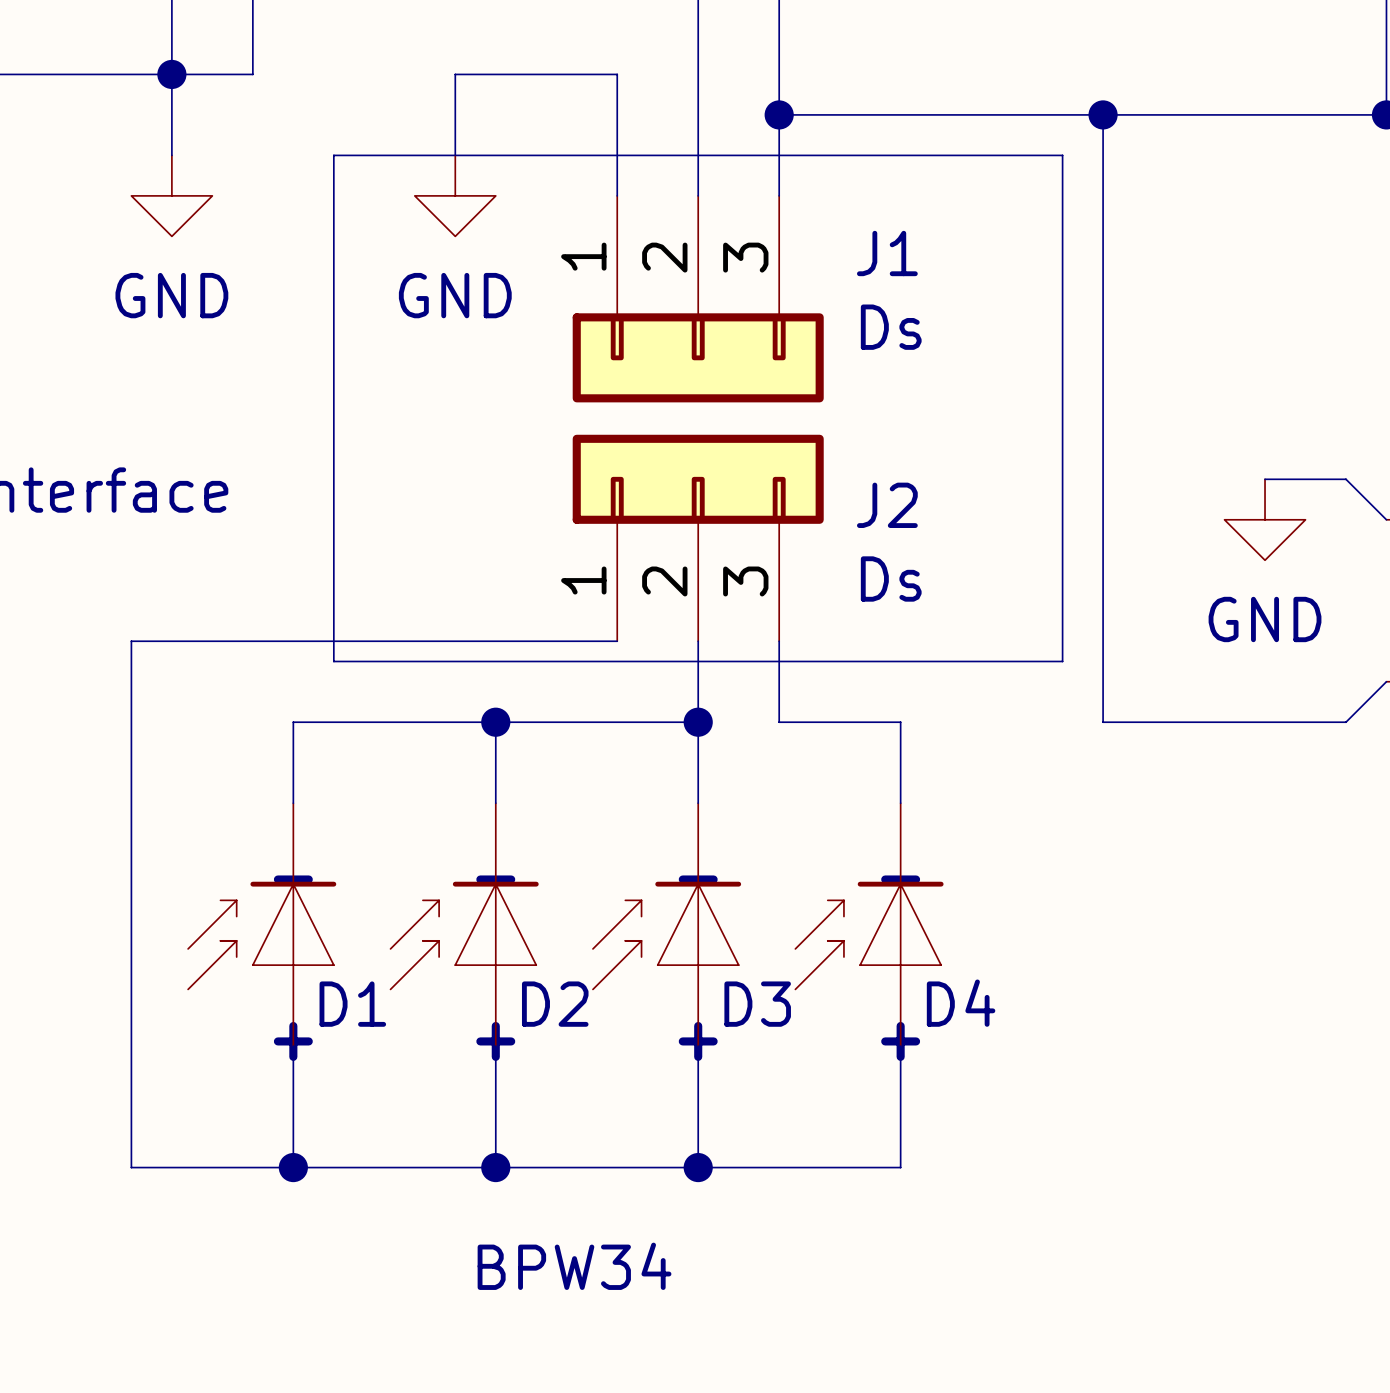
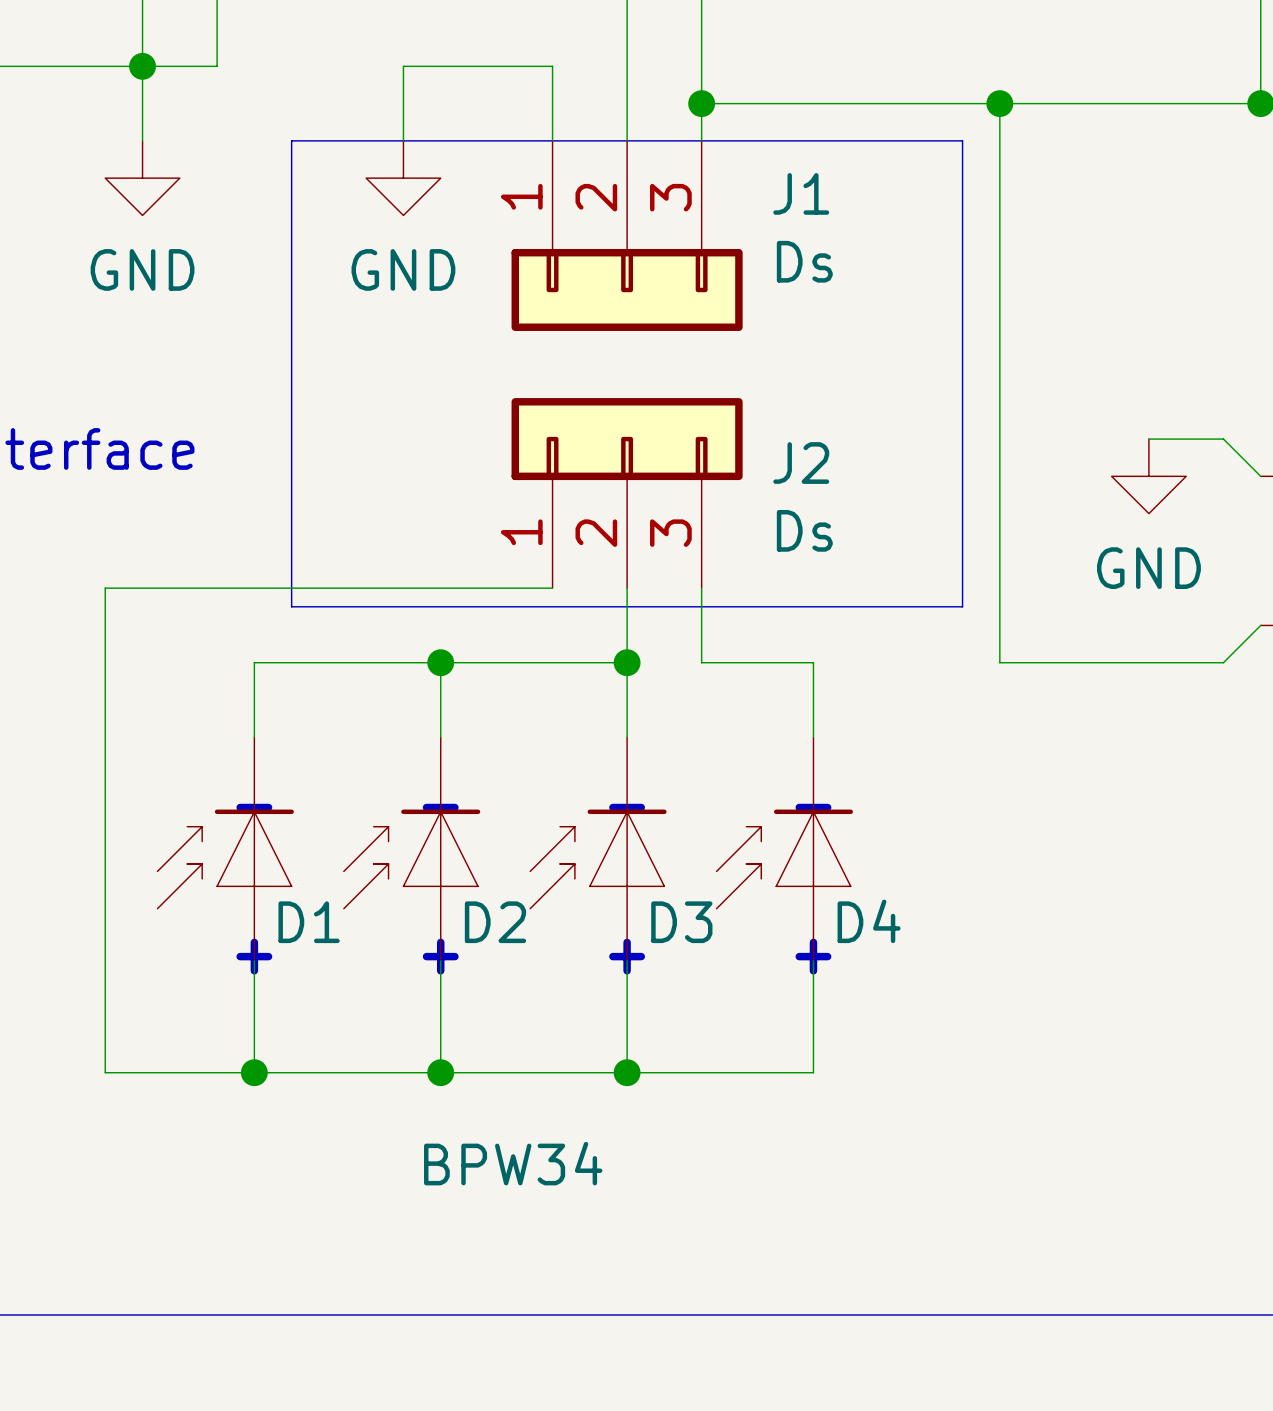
J1 position: (698, 299) -> (627, 235)

